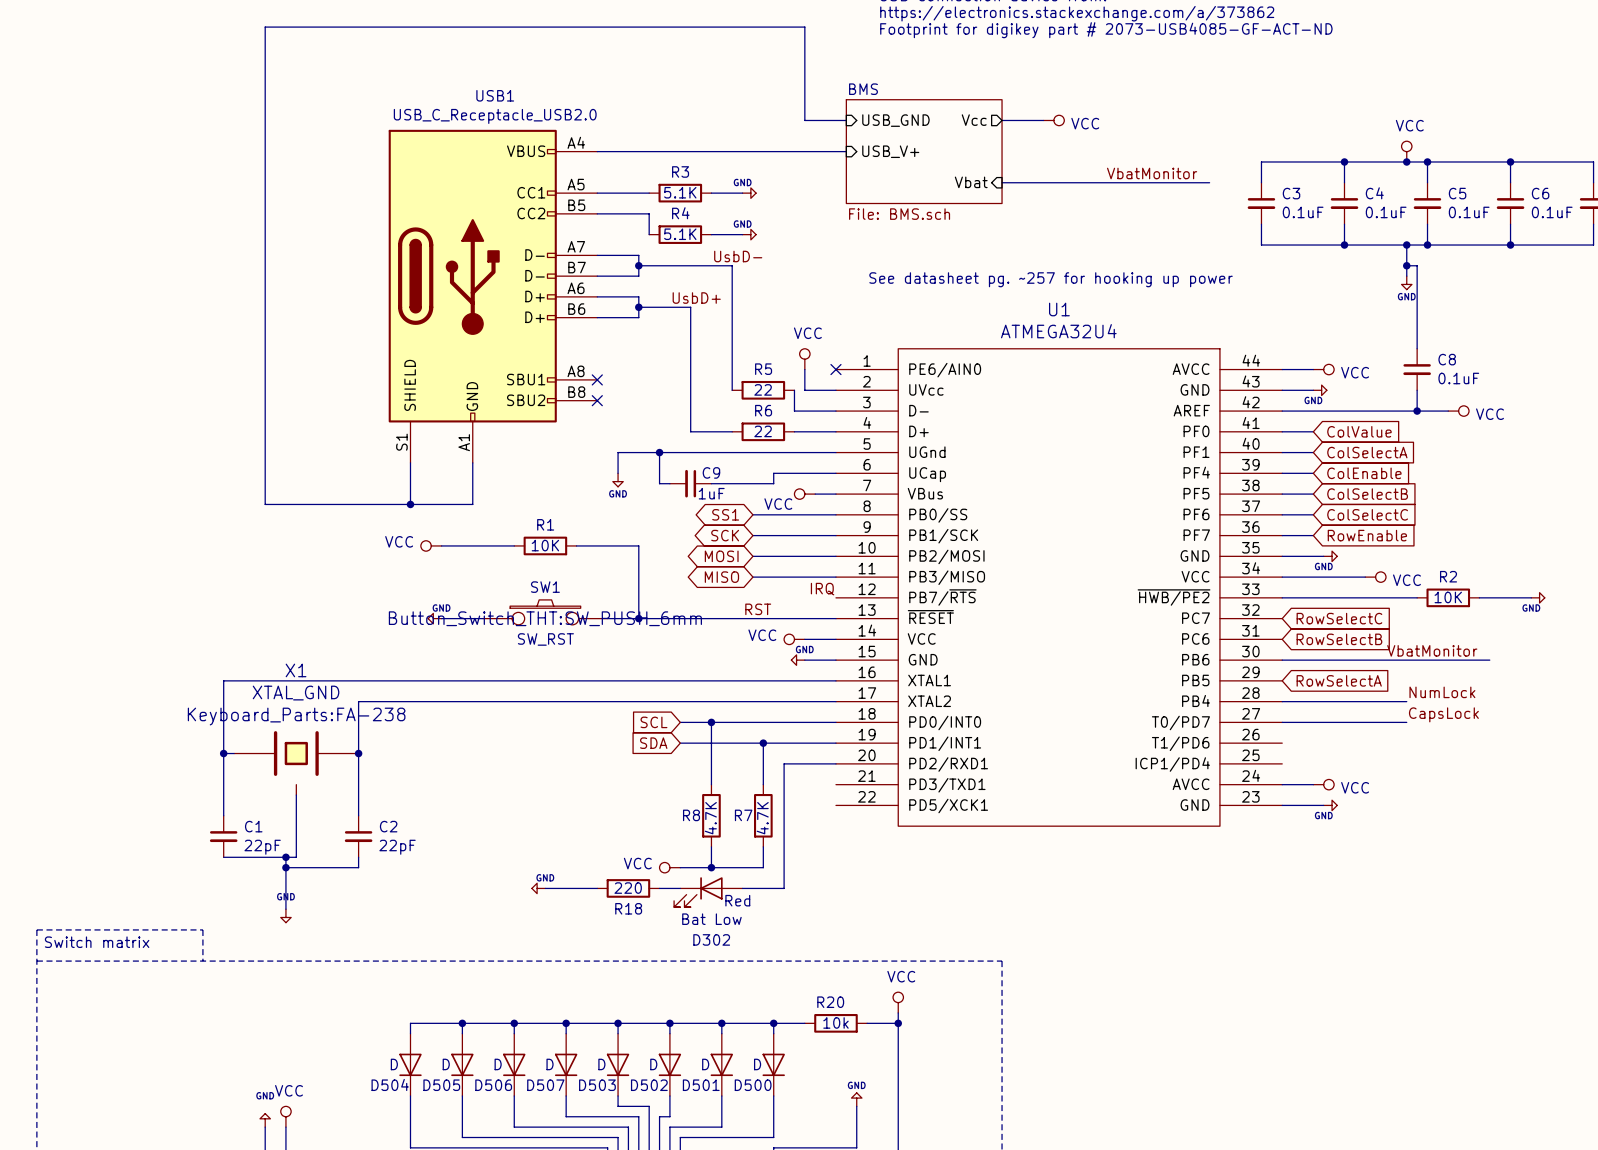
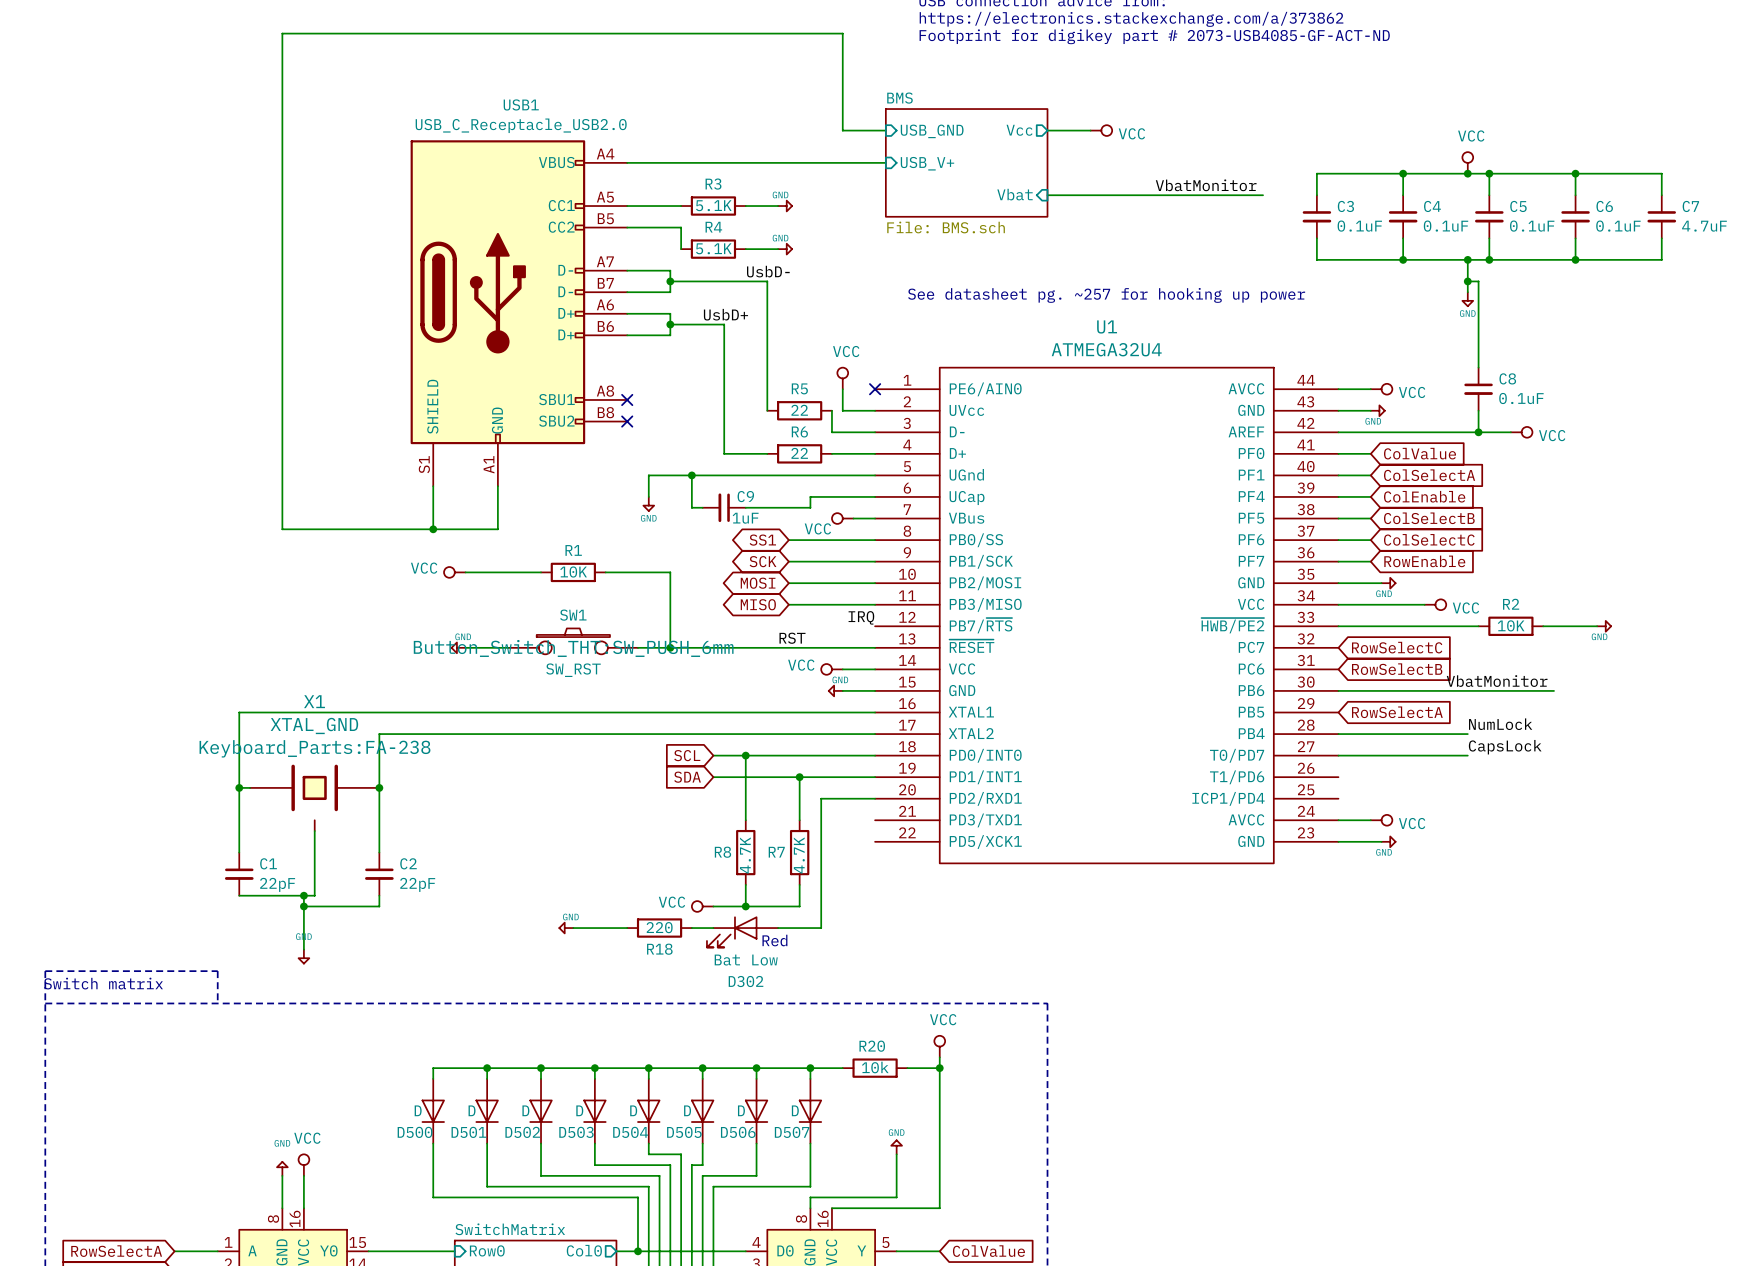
D504 name: D504 (390, 1084) -> D500 (415, 1132)
D505 name: D505 (441, 1085) -> D501 (468, 1132)
D506 name: D506 (493, 1085) -> D502 (522, 1132)
D507 name: D507 (545, 1085) -> D503 (576, 1132)
D503 name: D503 (597, 1085) -> D504 (630, 1132)
D502 name: D502 (649, 1085) -> D505 (684, 1132)
D501 name: D501 (701, 1085) -> D506 (738, 1132)
D500 name: D500 (753, 1085) -> D507 (792, 1132)

